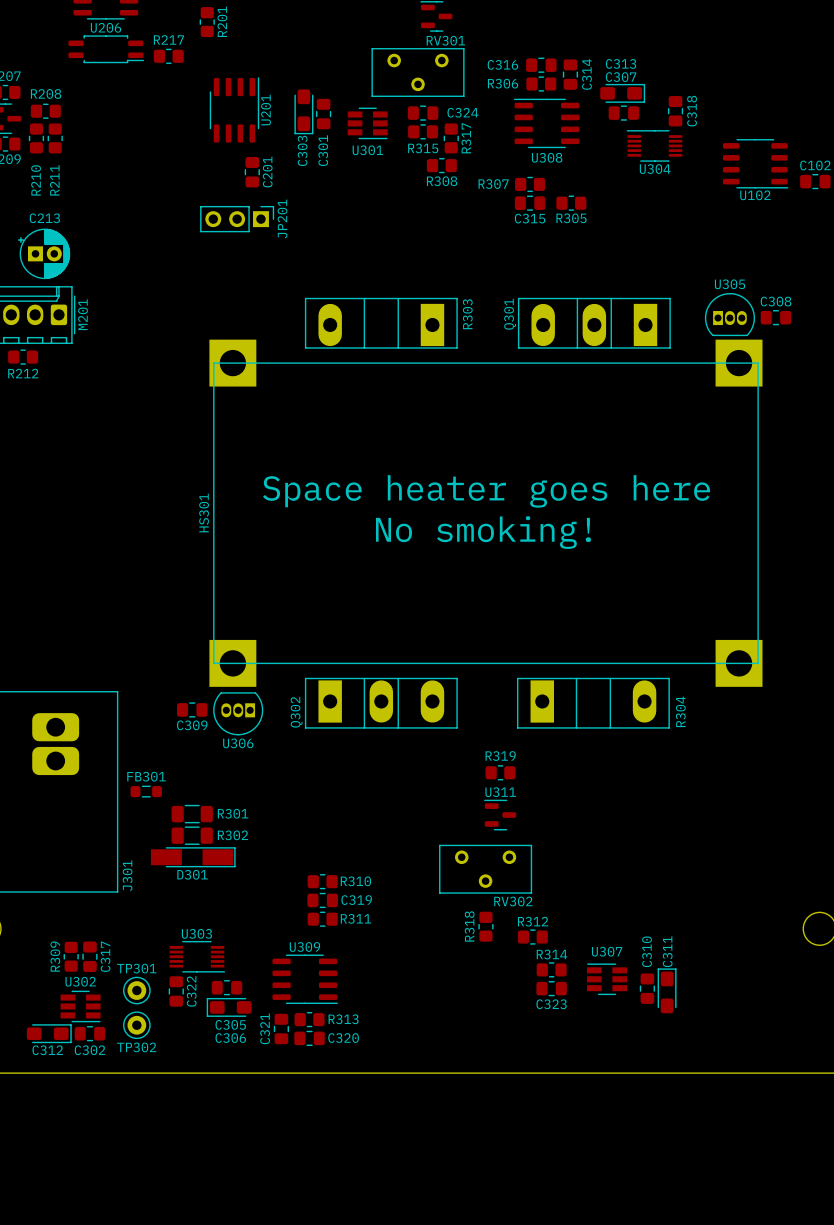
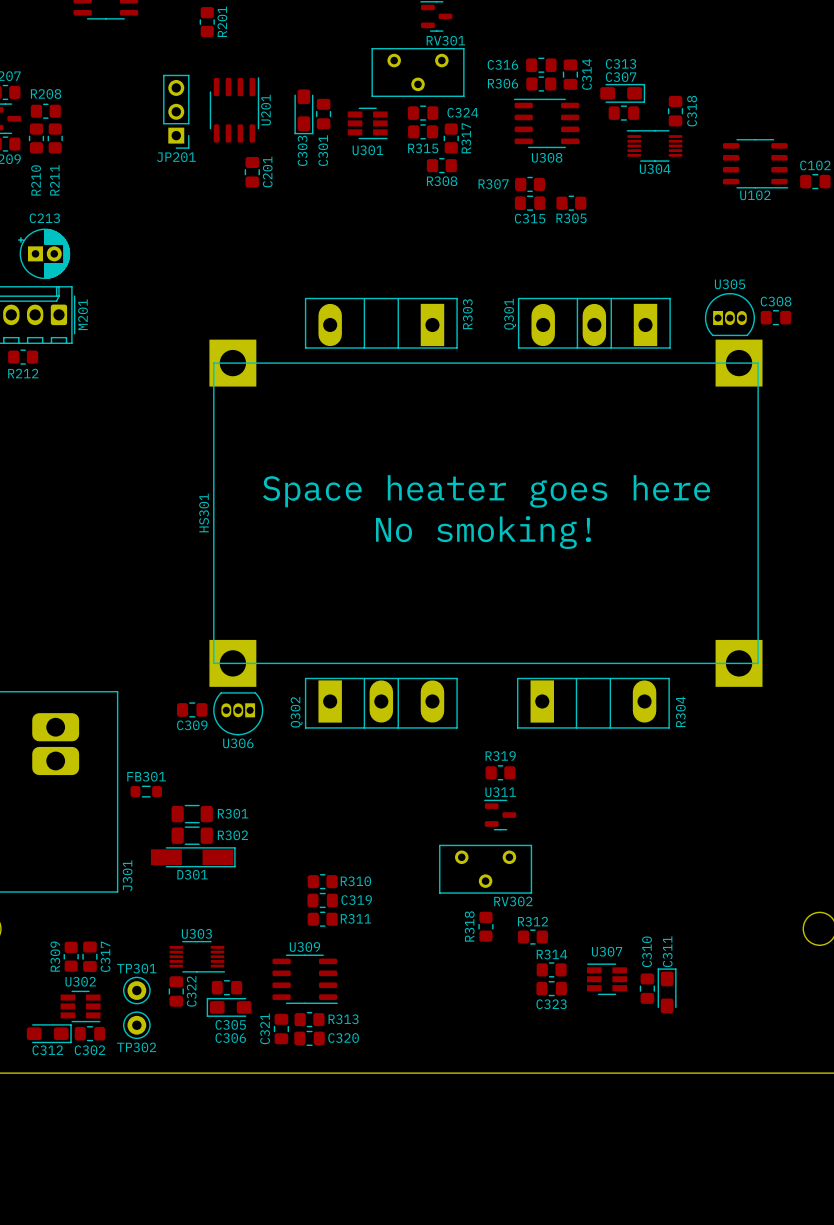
U206: (106, 49) -> none
R217: (168, 56) -> none
JP201 rotation: 0° (237, 219) -> 90° clockwise (176, 111)
JP201 position: (237, 219) -> (176, 111)

